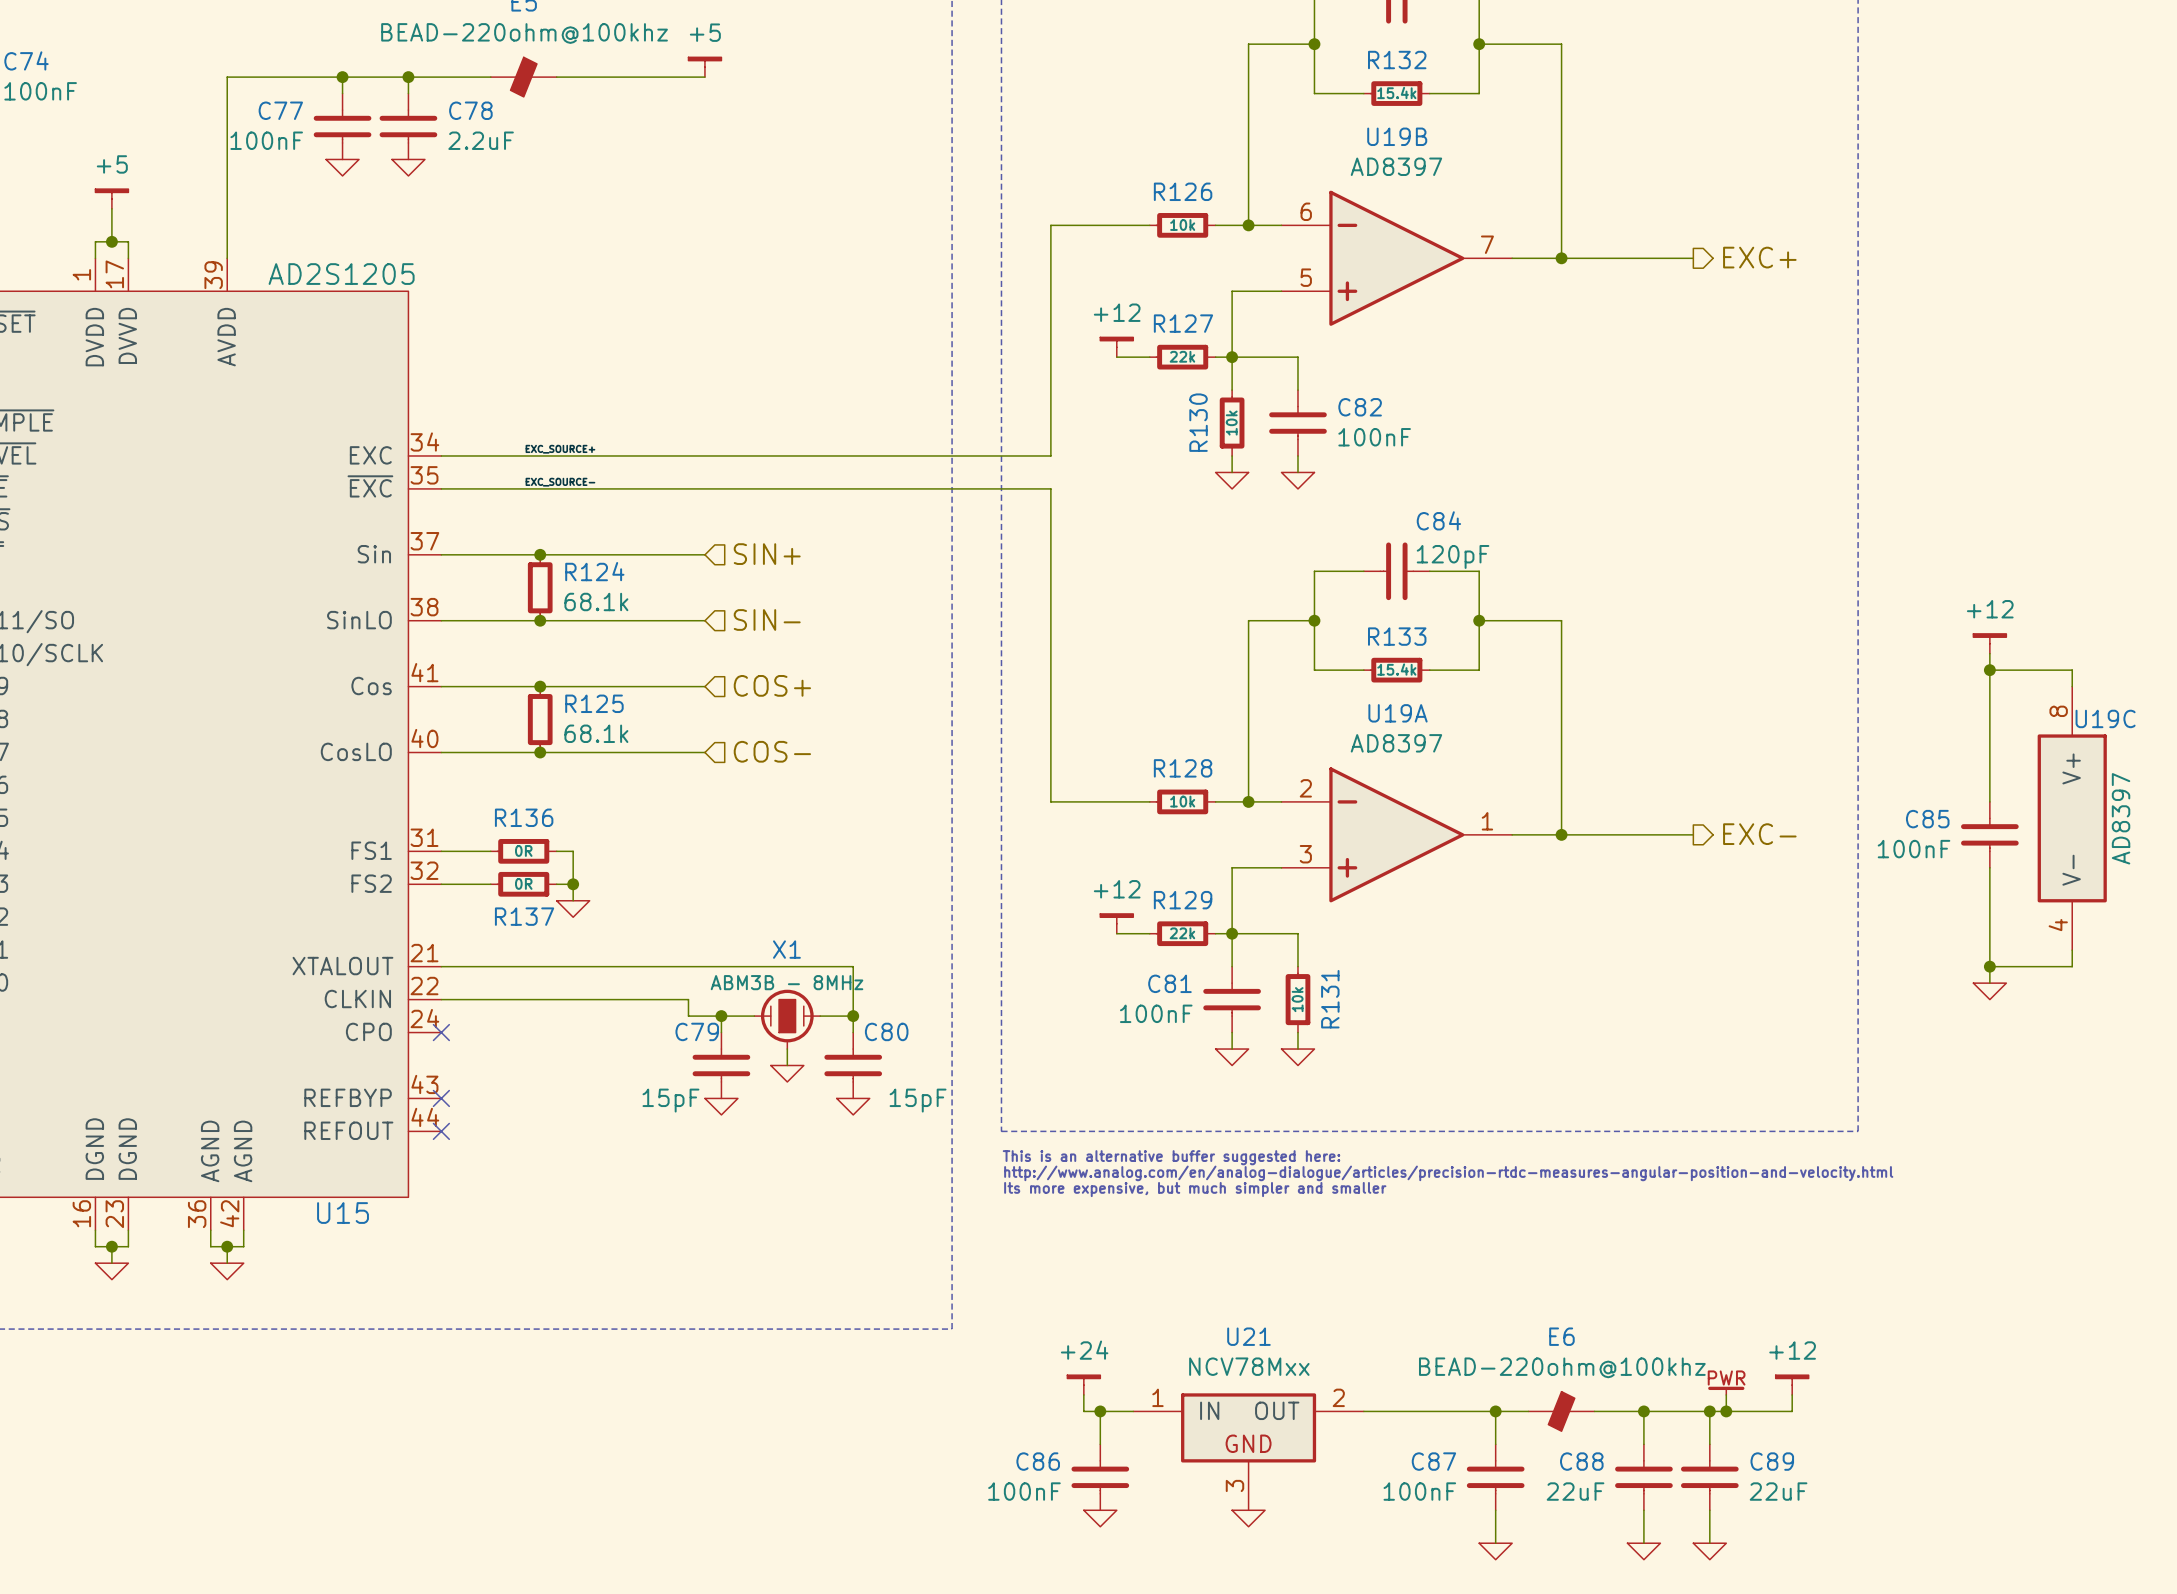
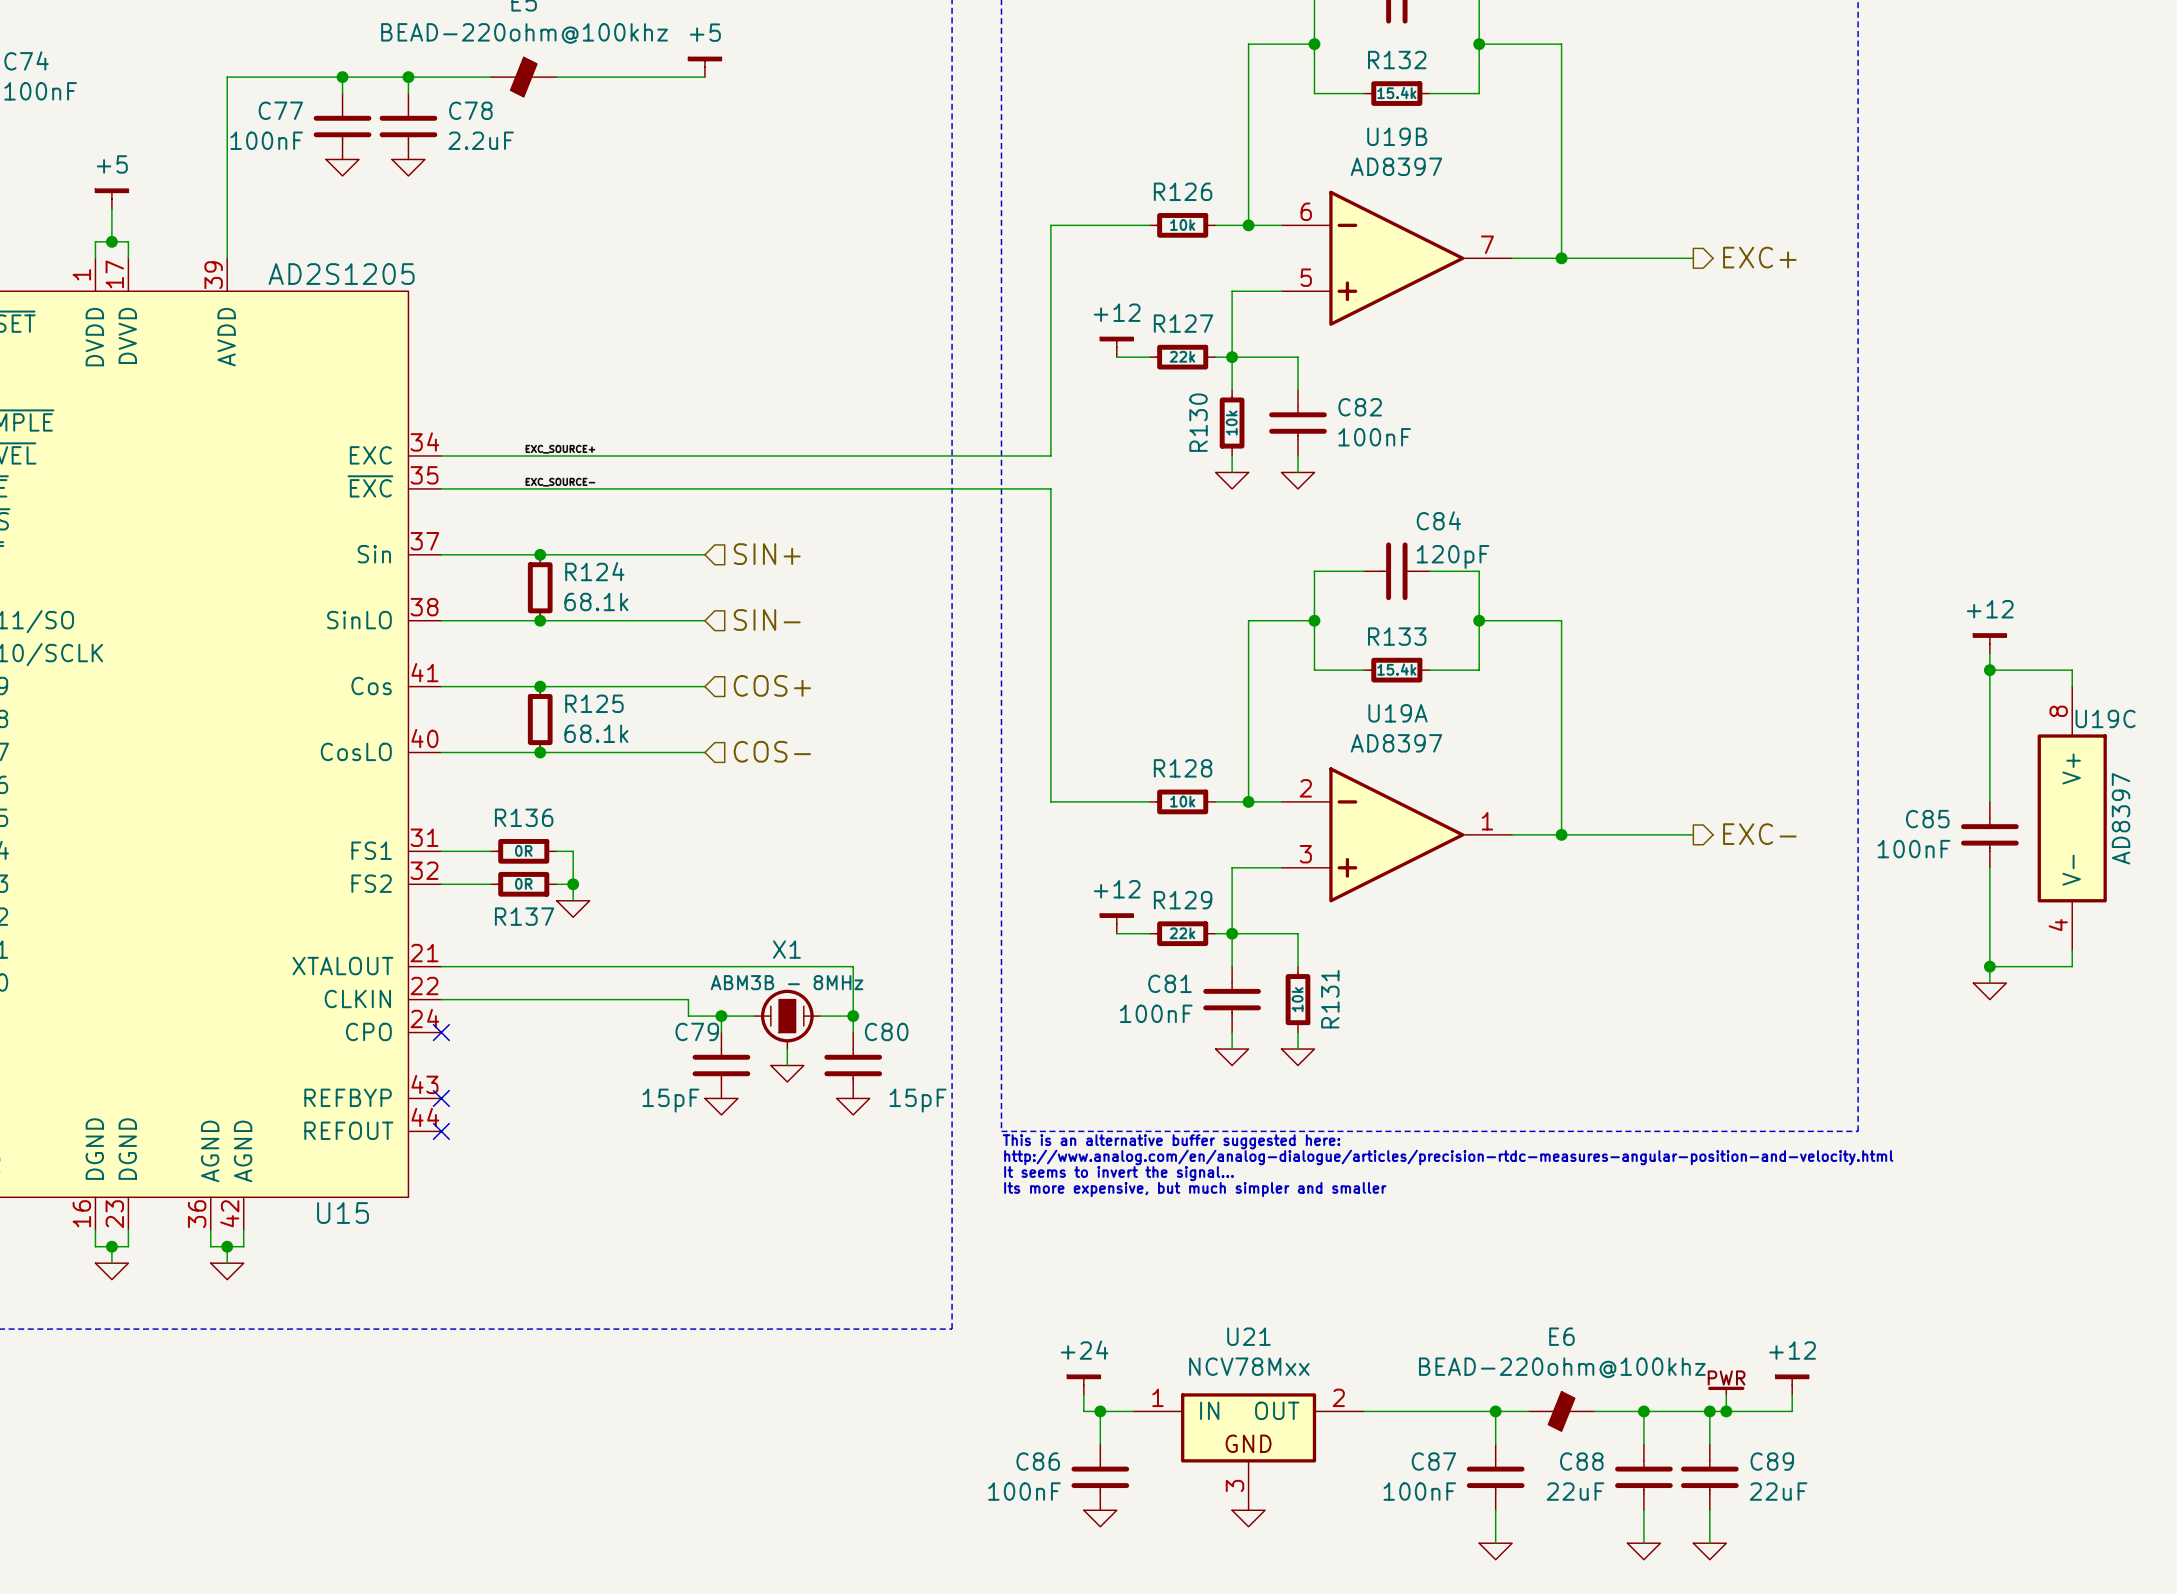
text: none -> This is an alternative buffer suggested here: (1171, 1141)
text: This is an alternative buffer suggested here: (1171, 1157) -> http://www.analog.com/en/analog-dialogue/articles/precision-rtdc-measures-angular-position-and-velocity.html (1448, 1157)
text: http://www.analog.com/en/analog-dialogue/articles/precision-rtdc-measures-angular-position-and-velocity.html (1448, 1173) -> It seems to invert the signal... (1119, 1173)

